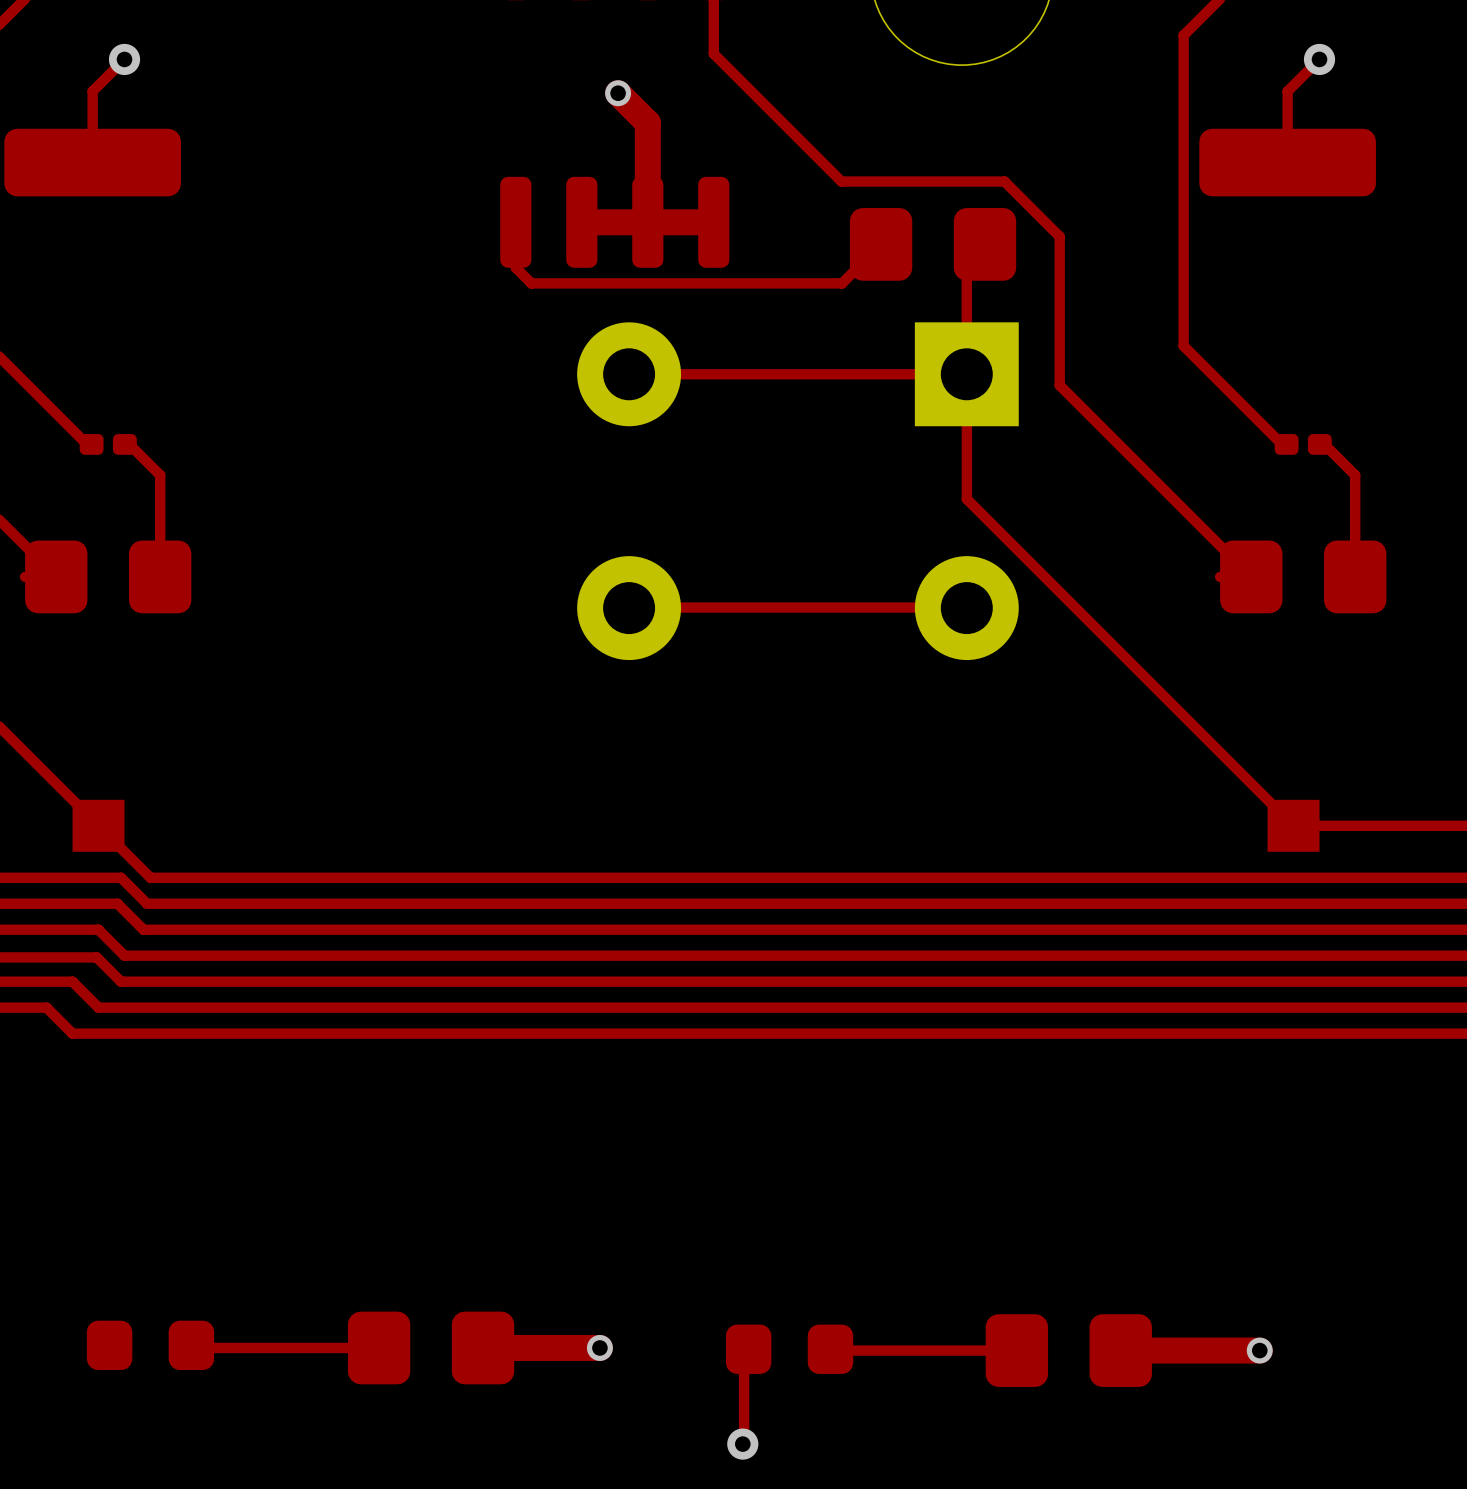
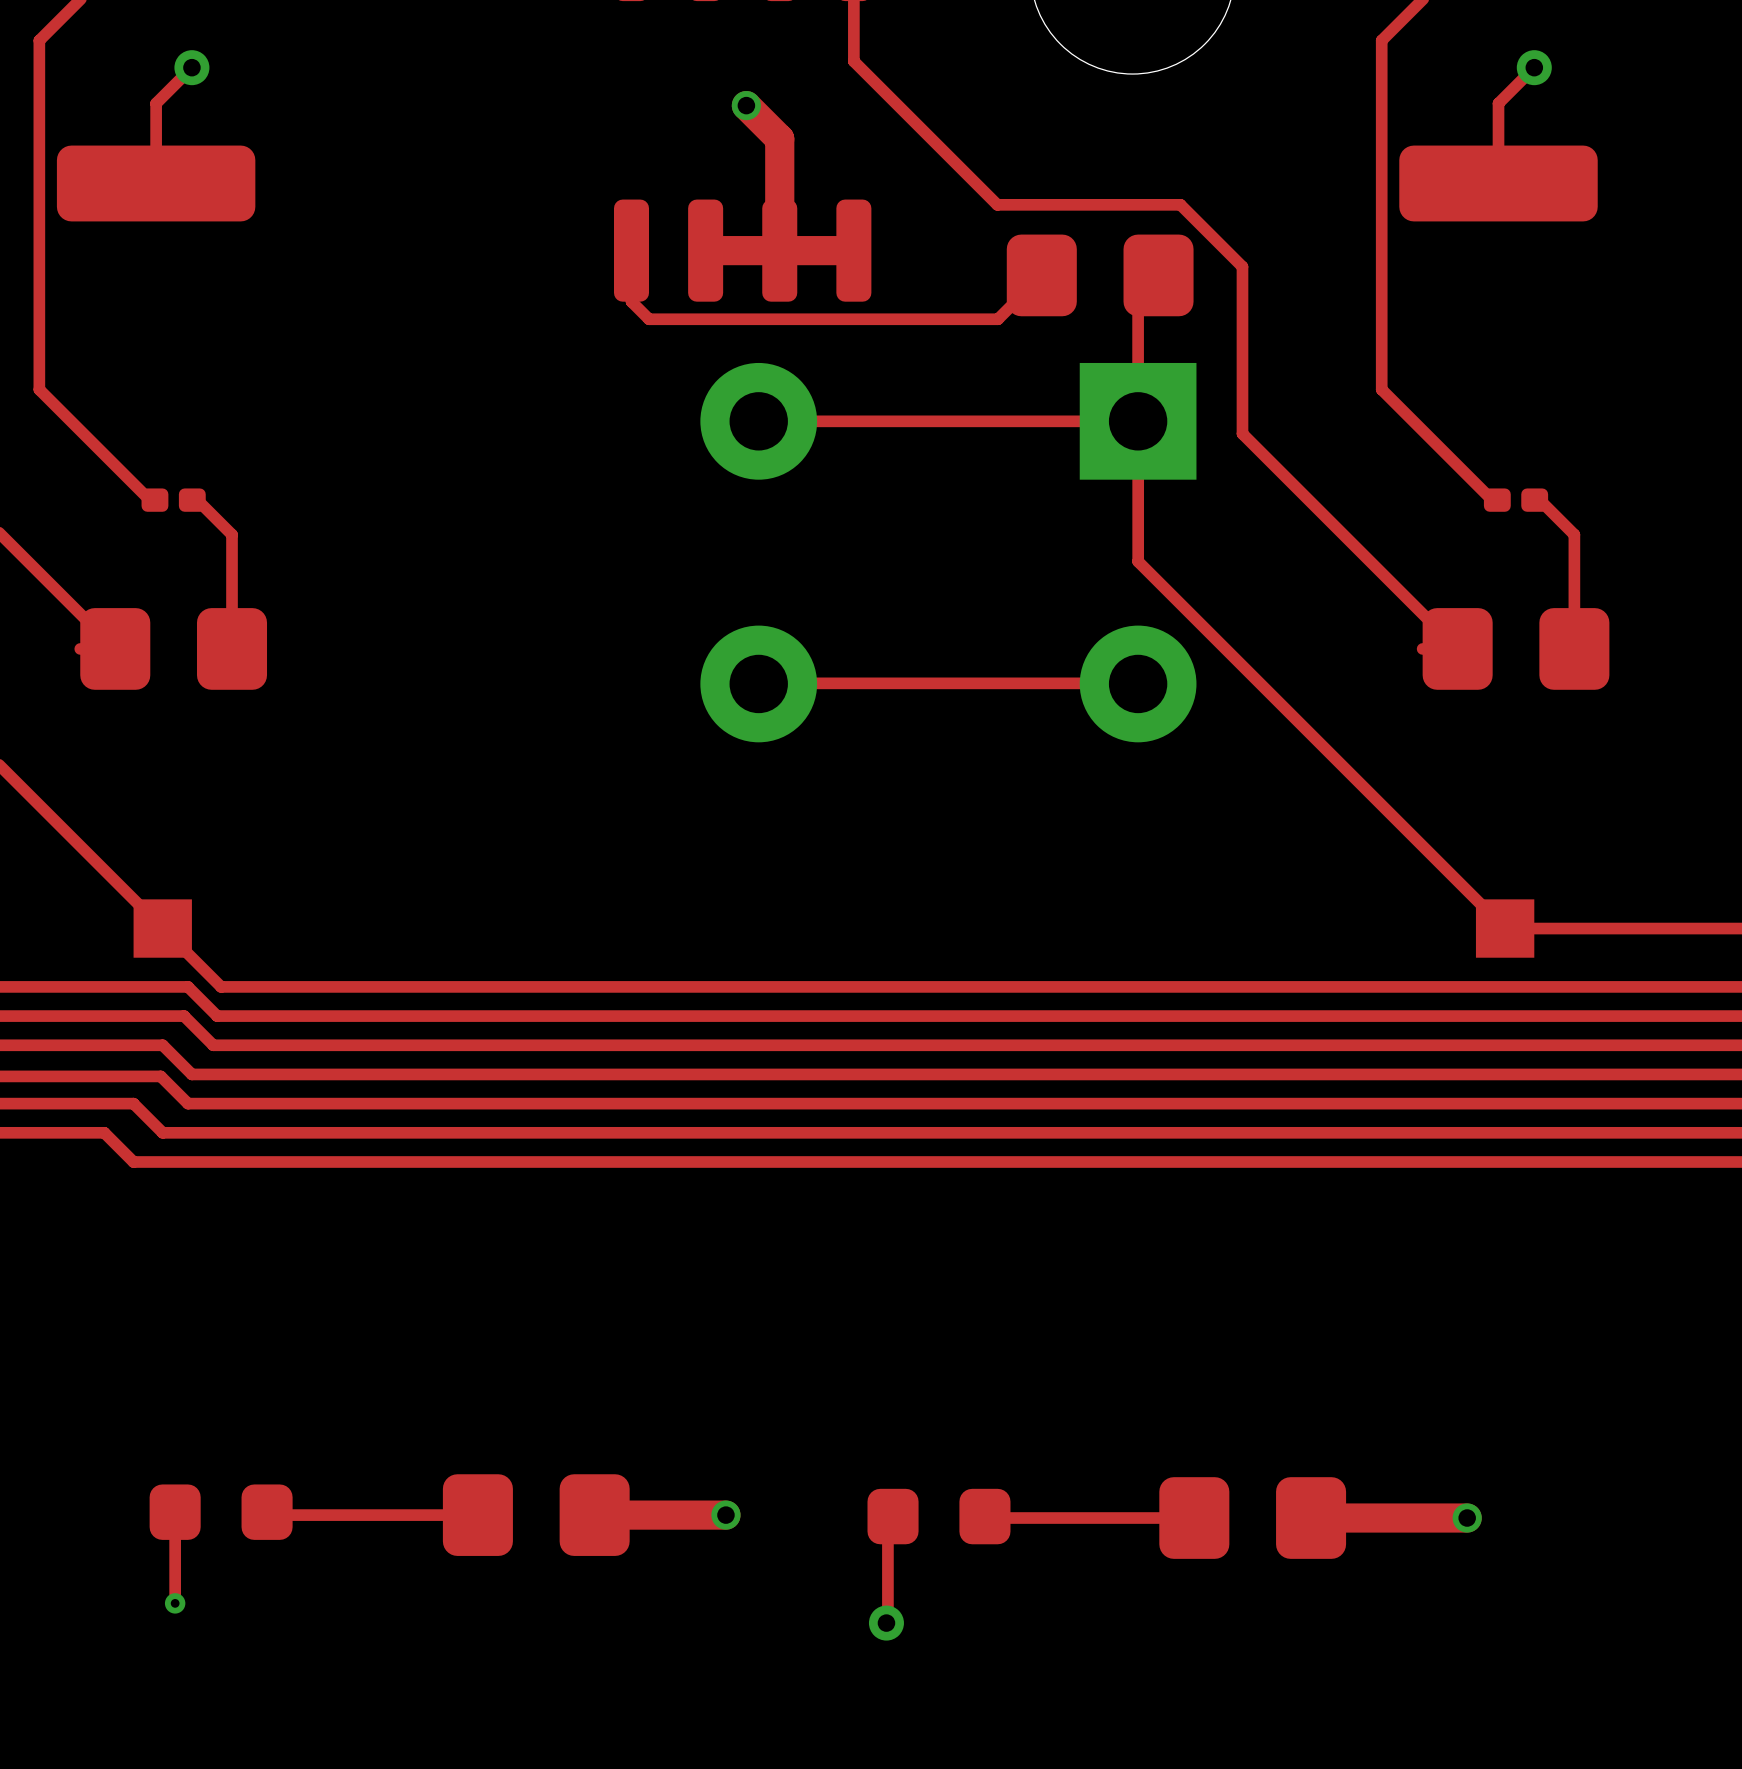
top track: none -> (175, 1512) (175, 1603)
via: none -> (175, 1603)

